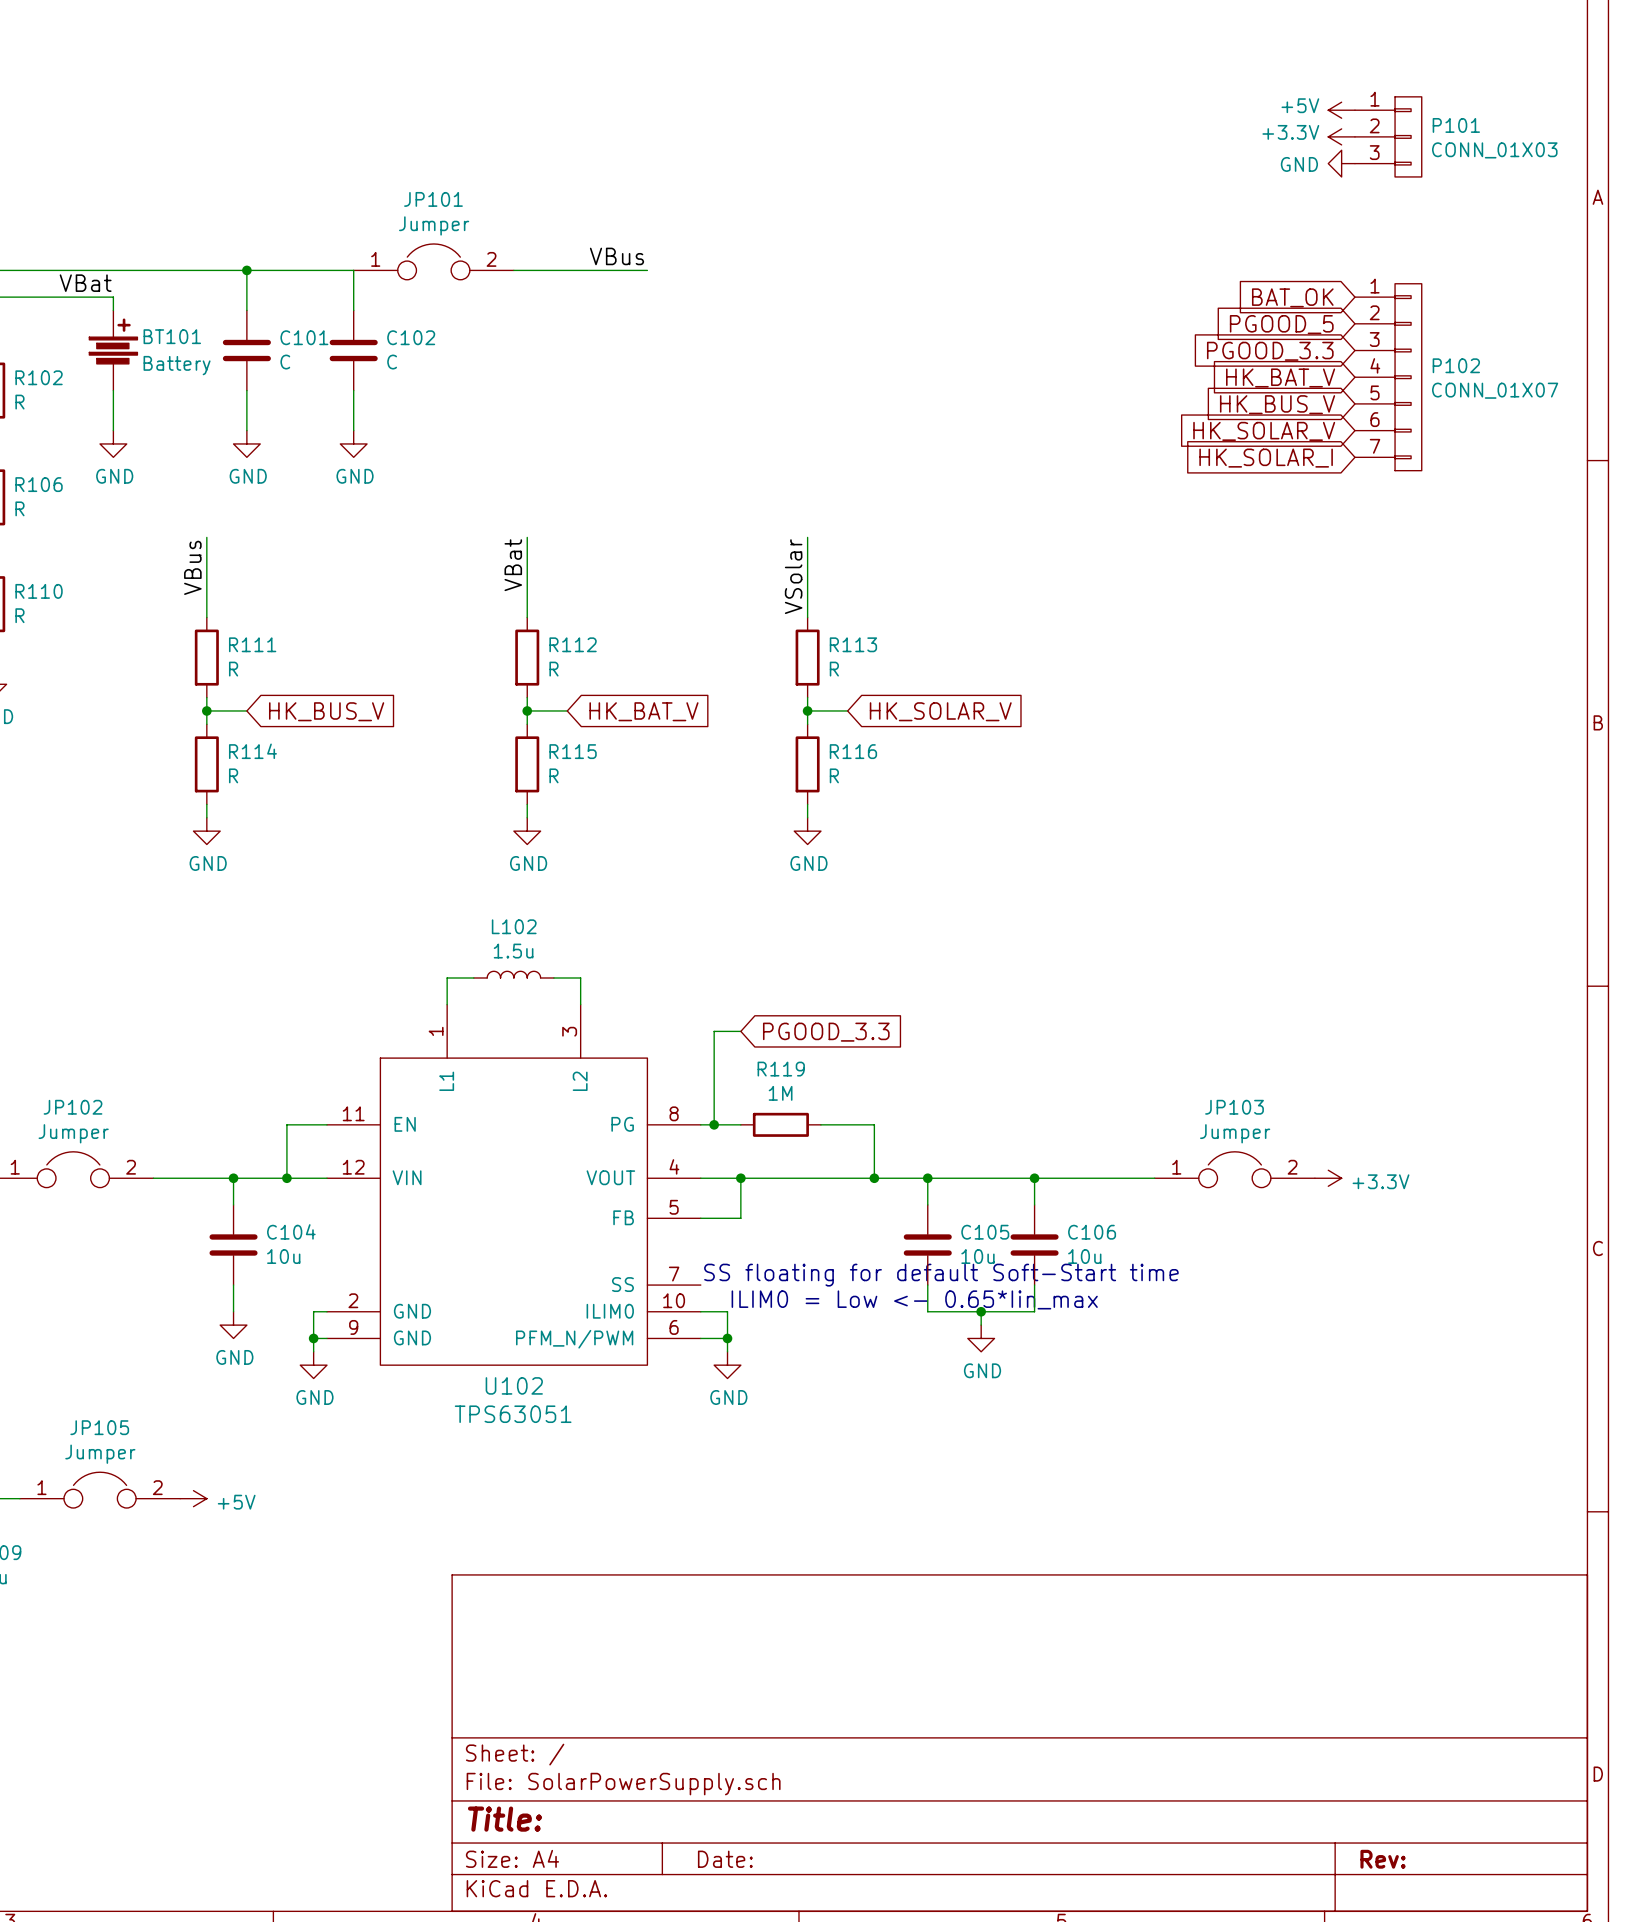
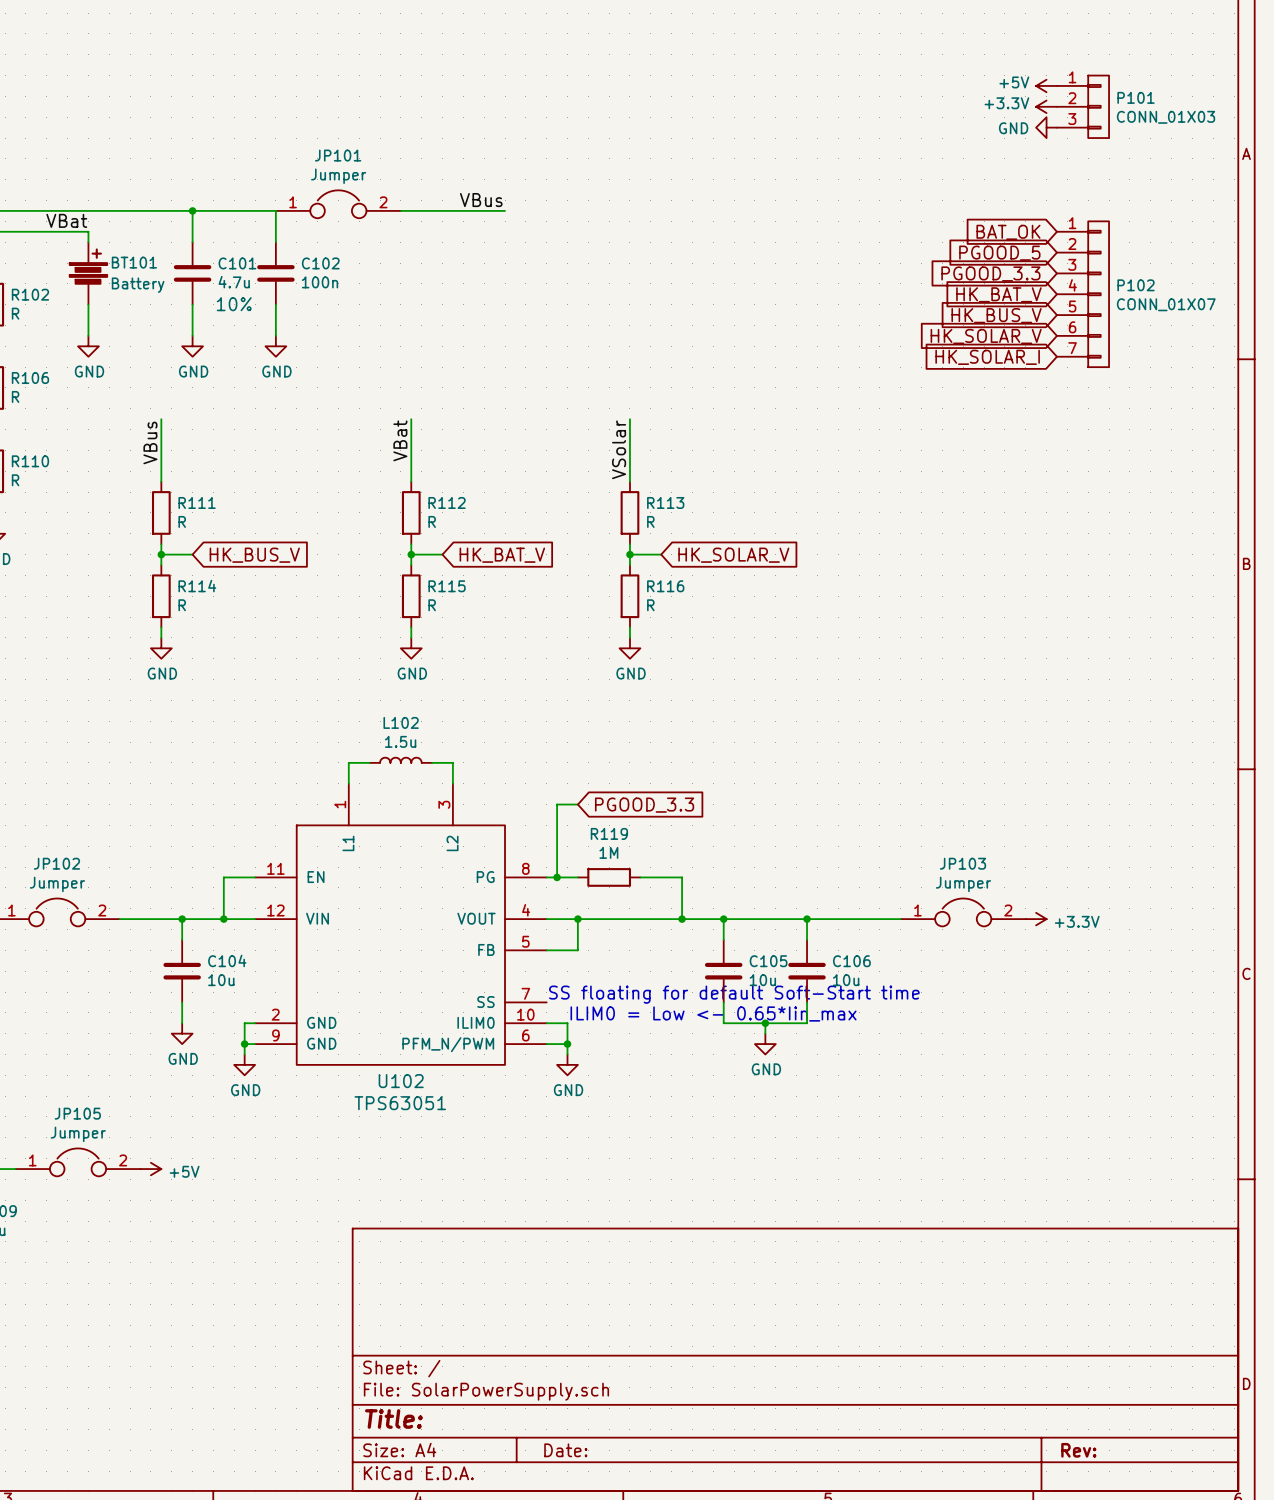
C101 value: C (285, 362) -> 4.7u (234, 282)
C102 value: C (392, 362) -> 100n (320, 282)
C101 text: none -> 10% (234, 304)

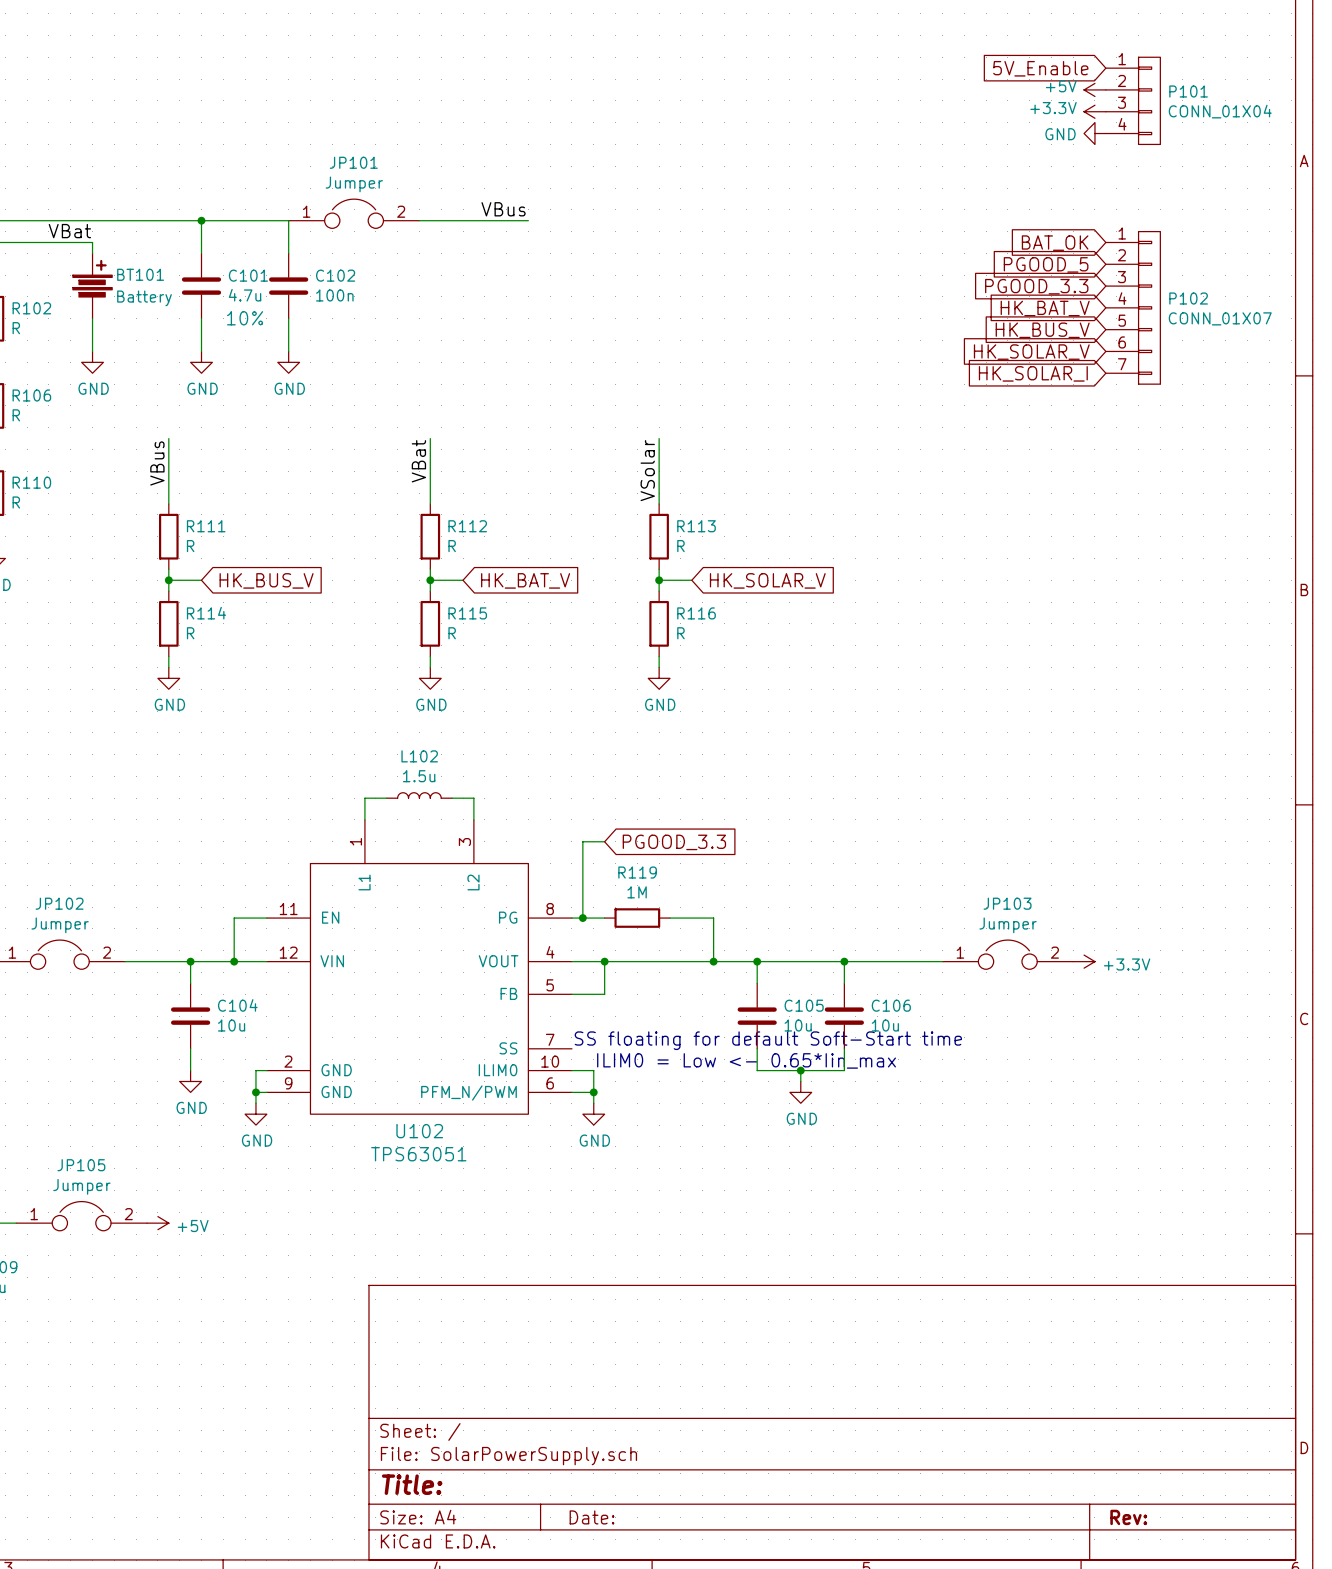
global label: none -> 5V_Enable (1040, 68)
P101 symbol: [1056, 75, 1110, 139] -> [1105, 57, 1161, 145]
P101 value: CONN_01X03 (1166, 117) -> CONN_01X04 (1220, 111)

